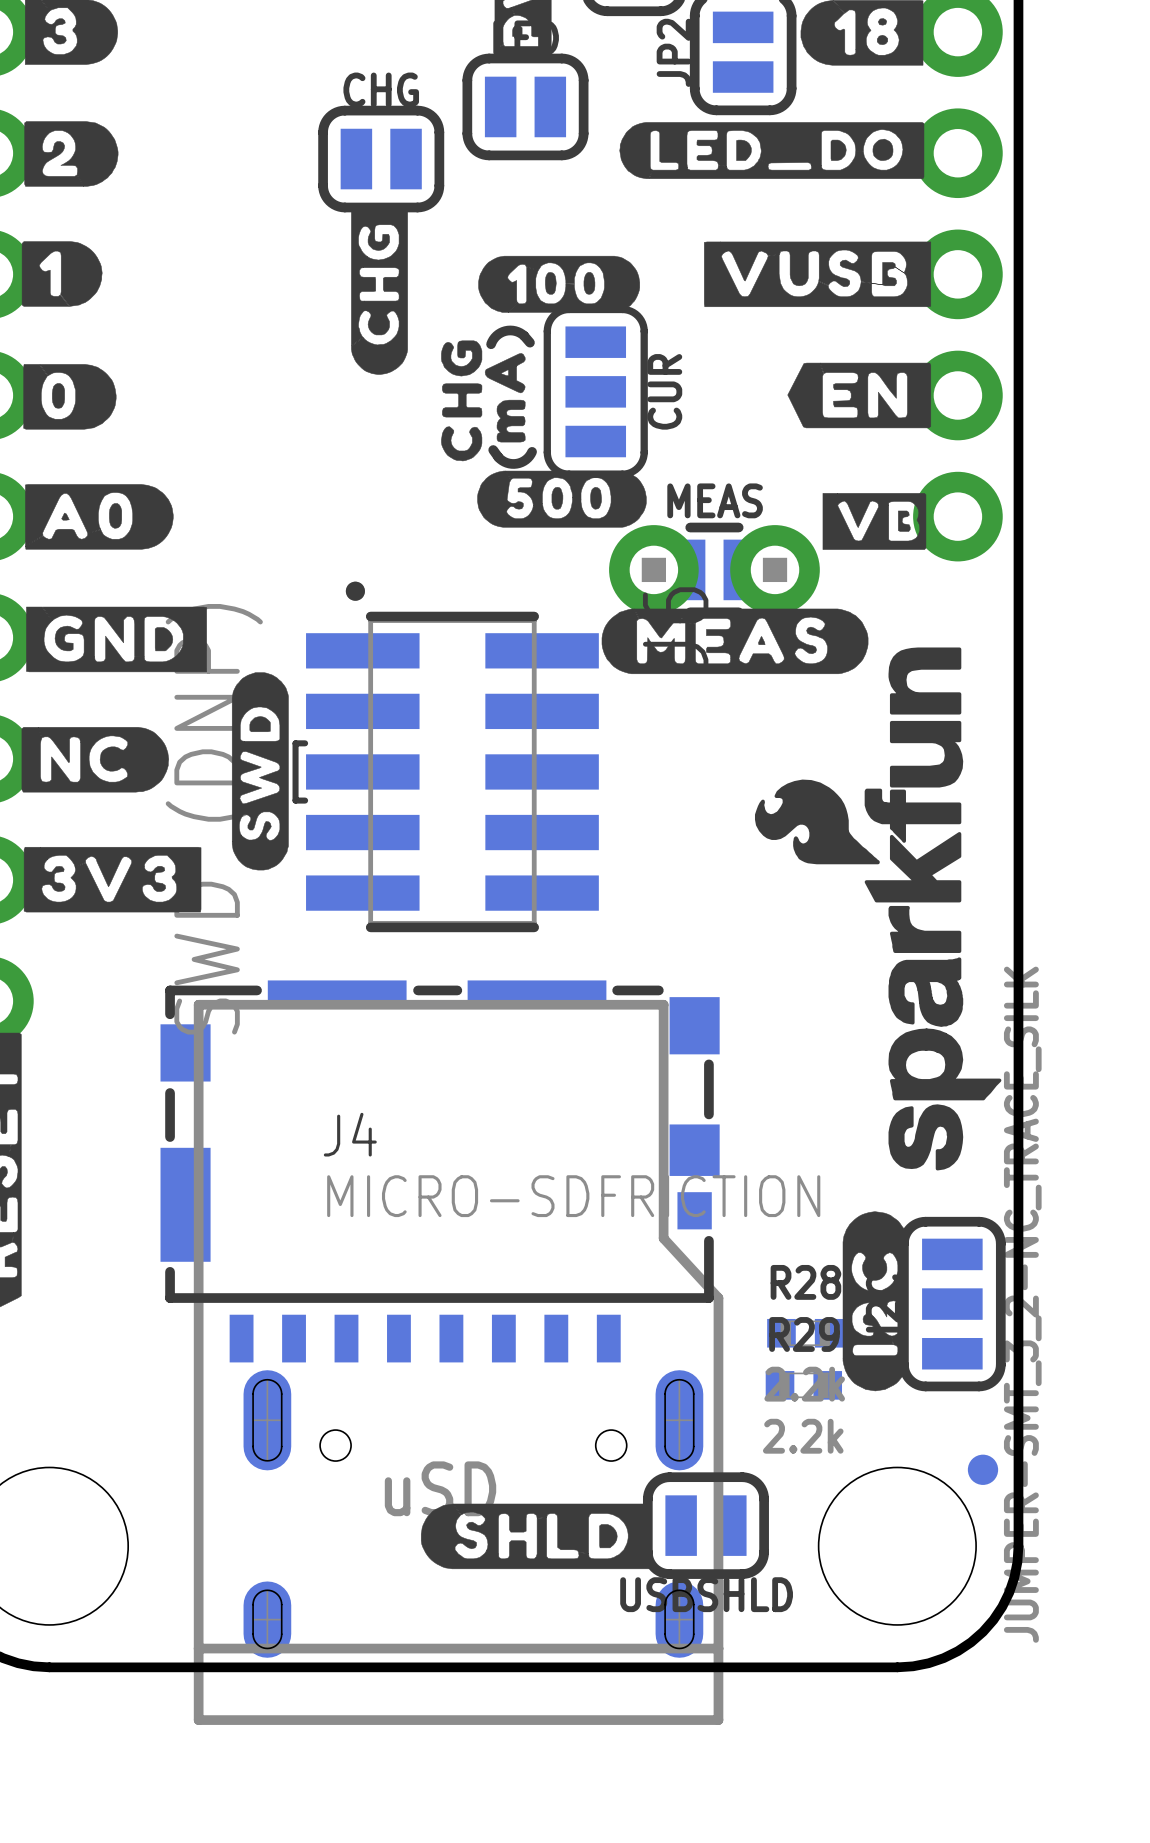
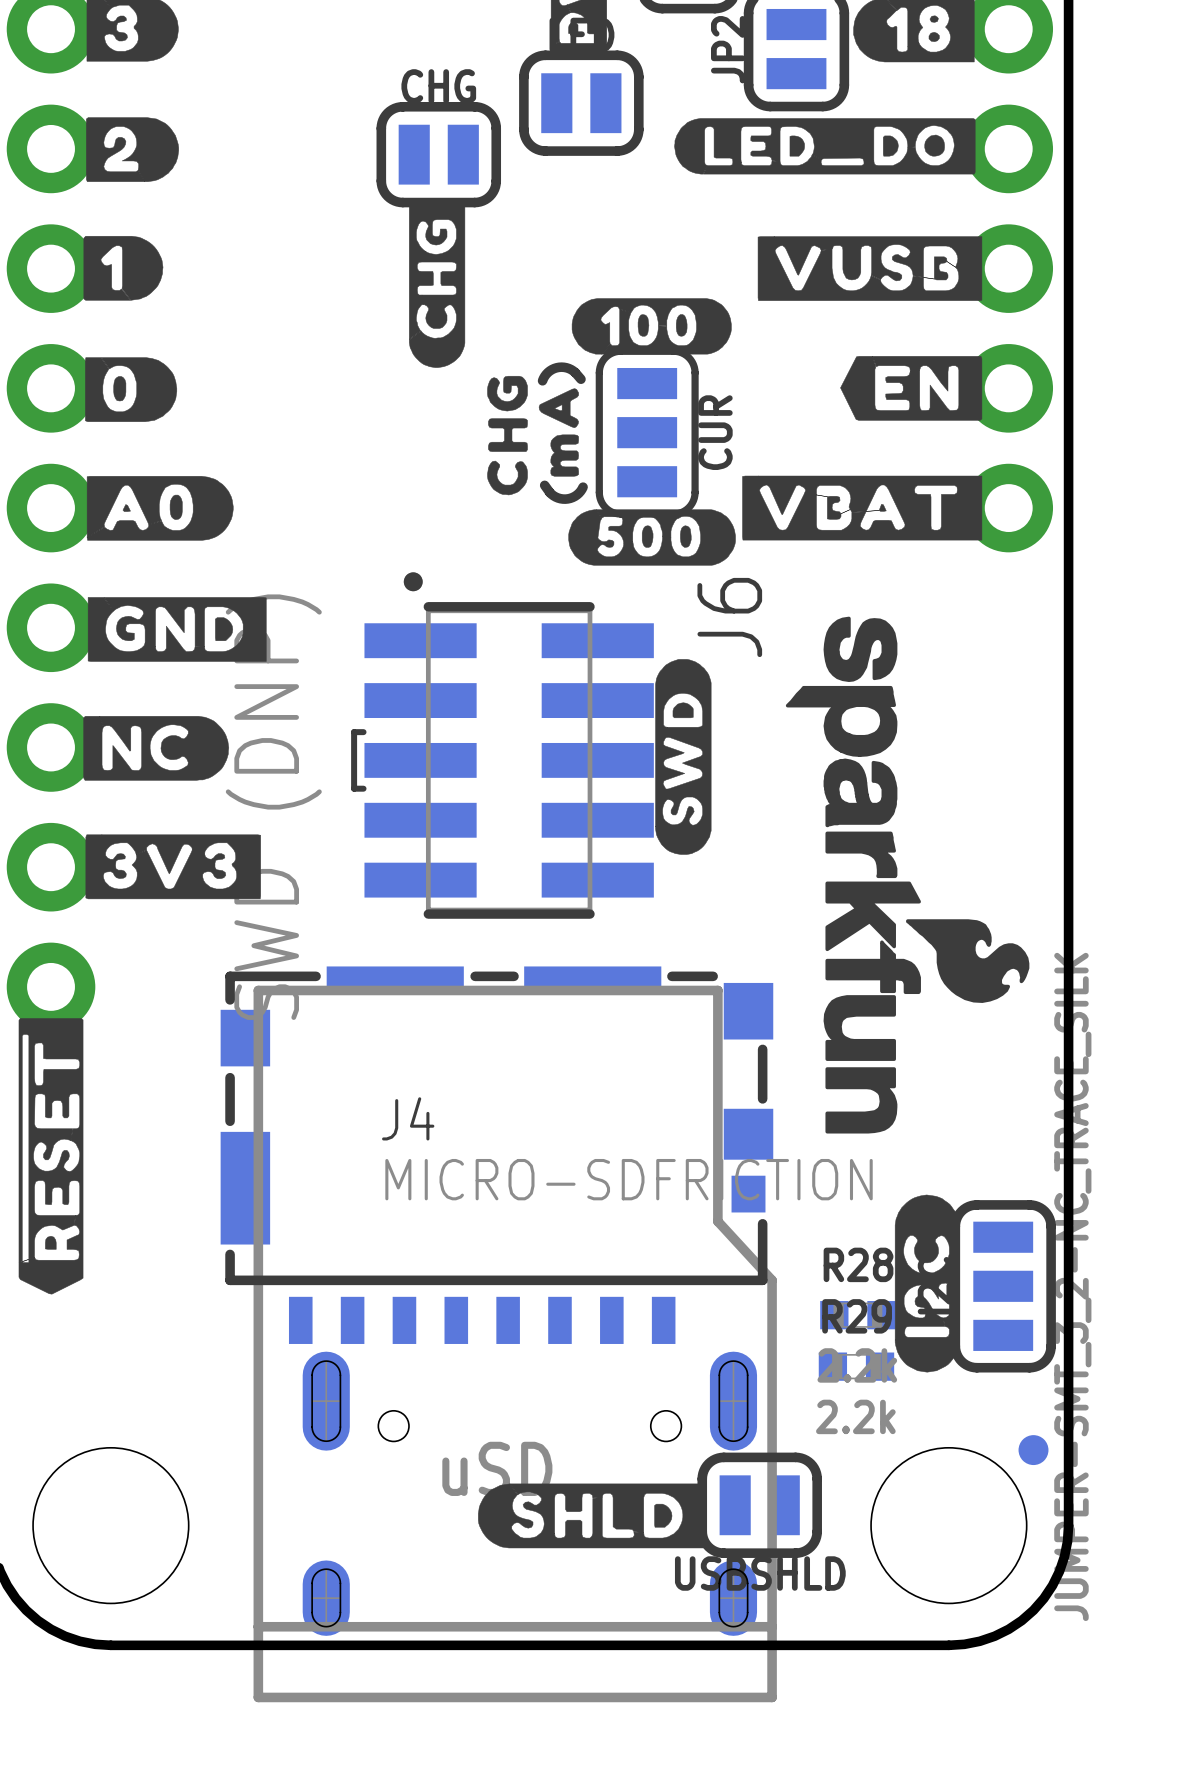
drawing position: (559, 284) -> (651, 326)
line: (529, 342) (520, 332) (510, 330) (498, 334) (491, 344) -> (580, 379) (571, 369) (561, 367) (549, 370) (542, 380)
CUR position: (595, 391) -> (647, 432)
drawing position: (505, 397) -> (558, 432)
drawing position: (461, 400) -> (507, 435)
line: (493, 450) (502, 460) (511, 463) (523, 461) (532, 451) -> (544, 485) (553, 495) (562, 499) (574, 496) (583, 487)
drawing: none -> [742, 475, 983, 541]
drawing: [822, 493, 927, 550] -> none
drawing position: (561, 499) -> (652, 537)
MEAS: (714, 569) -> none
drawing: [601, 608, 869, 675] -> none
drawing shape: [754, 647, 1002, 1171] -> [785, 616, 1030, 1134]
drawing position: (260, 771) -> (683, 756)

